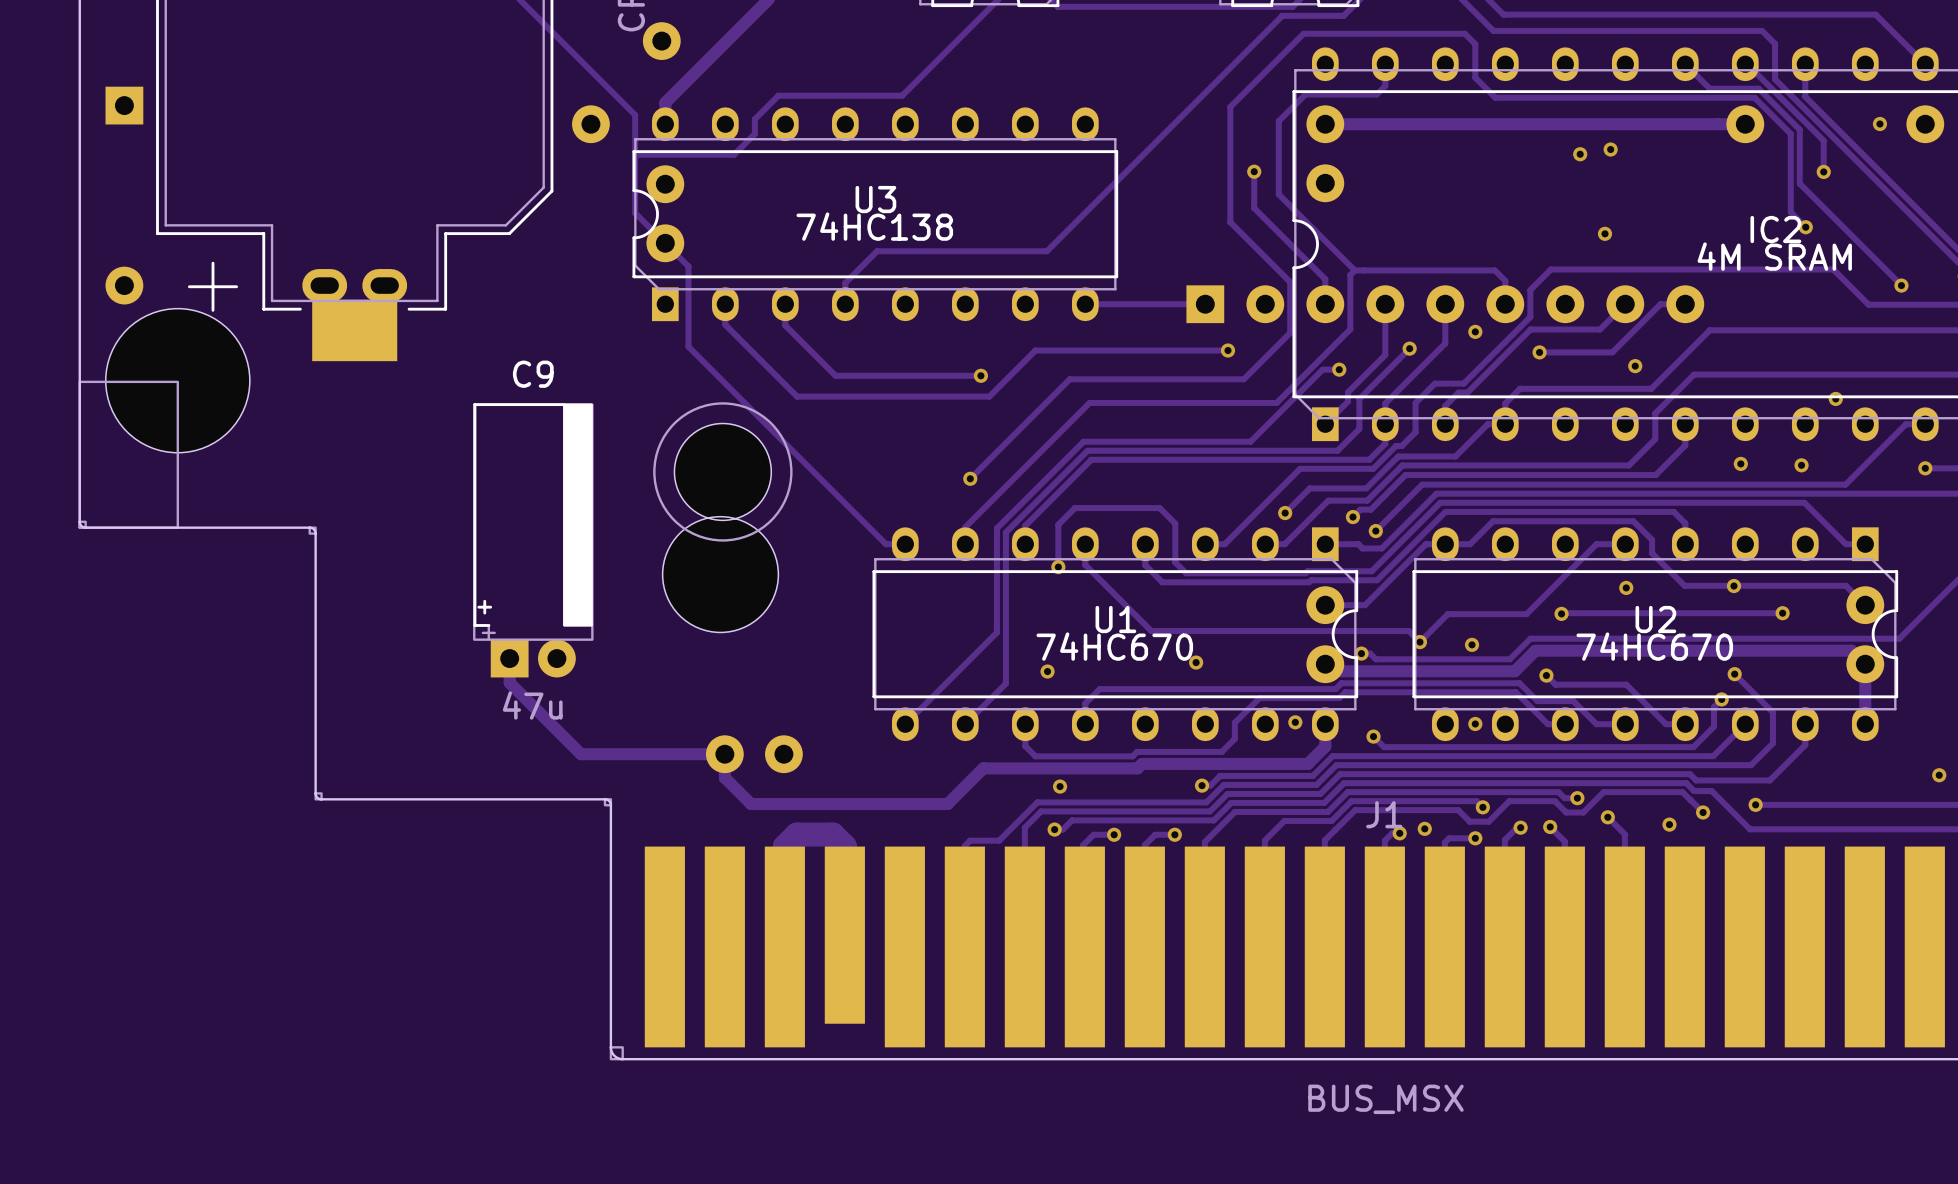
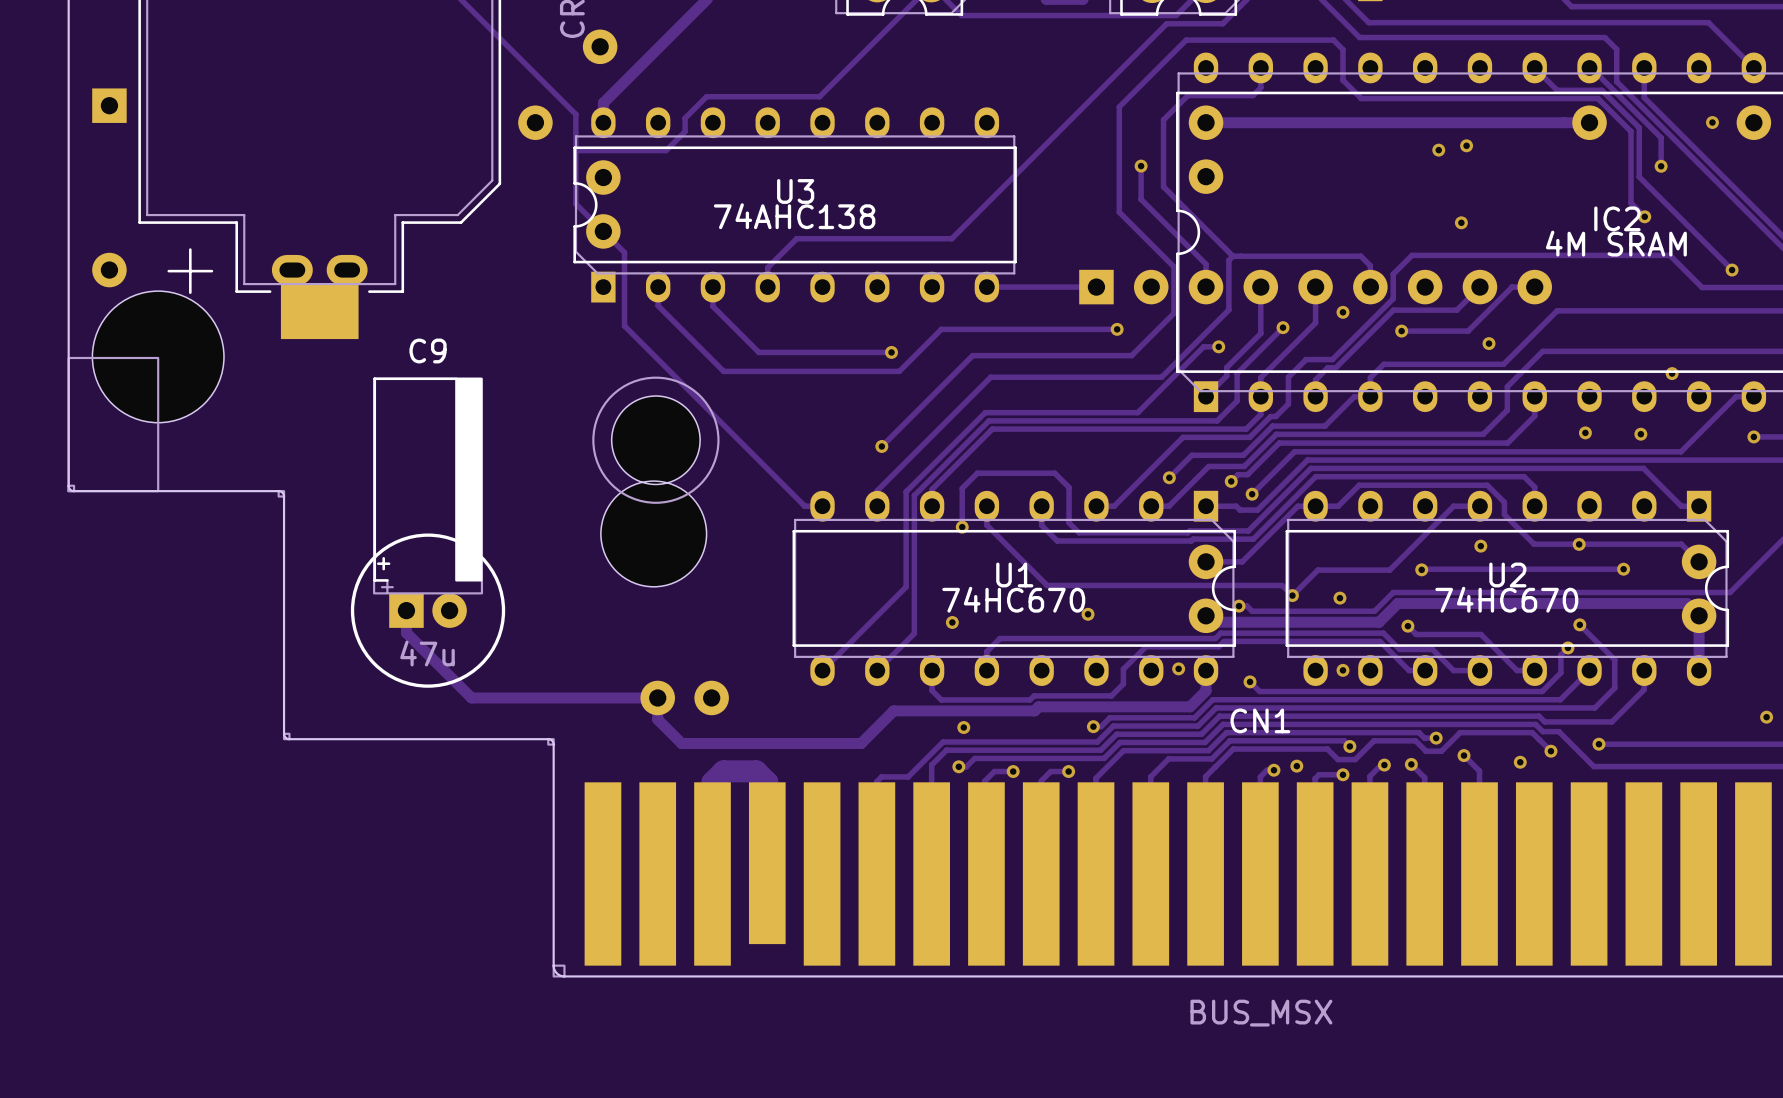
U3 value: 74HC138 (874, 226) -> 74AHC138 (794, 216)
C9 position: (533, 540) -> (428, 502)
drawing: none -> [350, 533, 506, 688]
track: (509, 658) (509, 682) (581, 754) -> (406, 610) (406, 632) (471, 697) (526, 697)
J1 name: J1 (1384, 814) -> CN1 (1260, 720)

